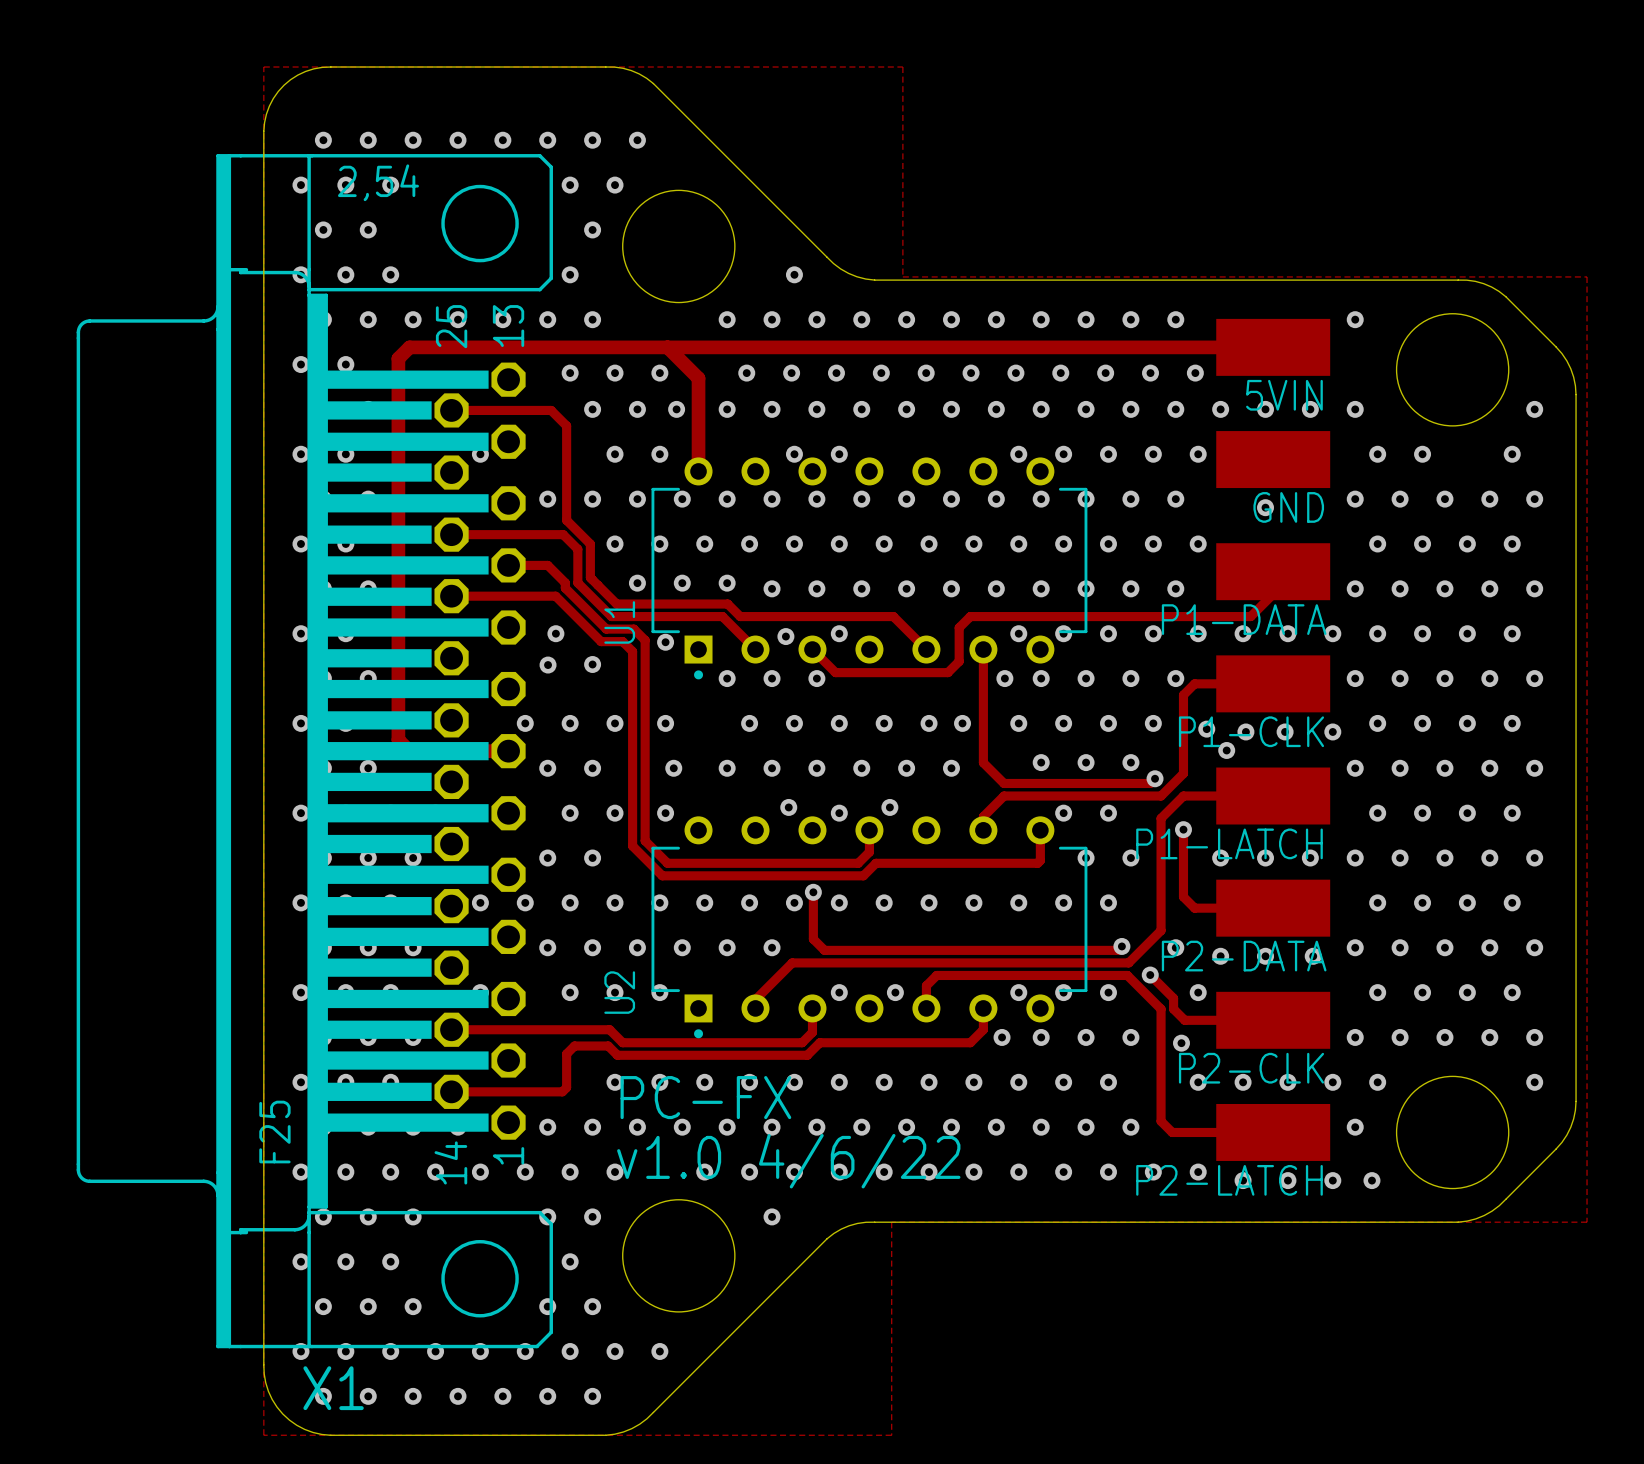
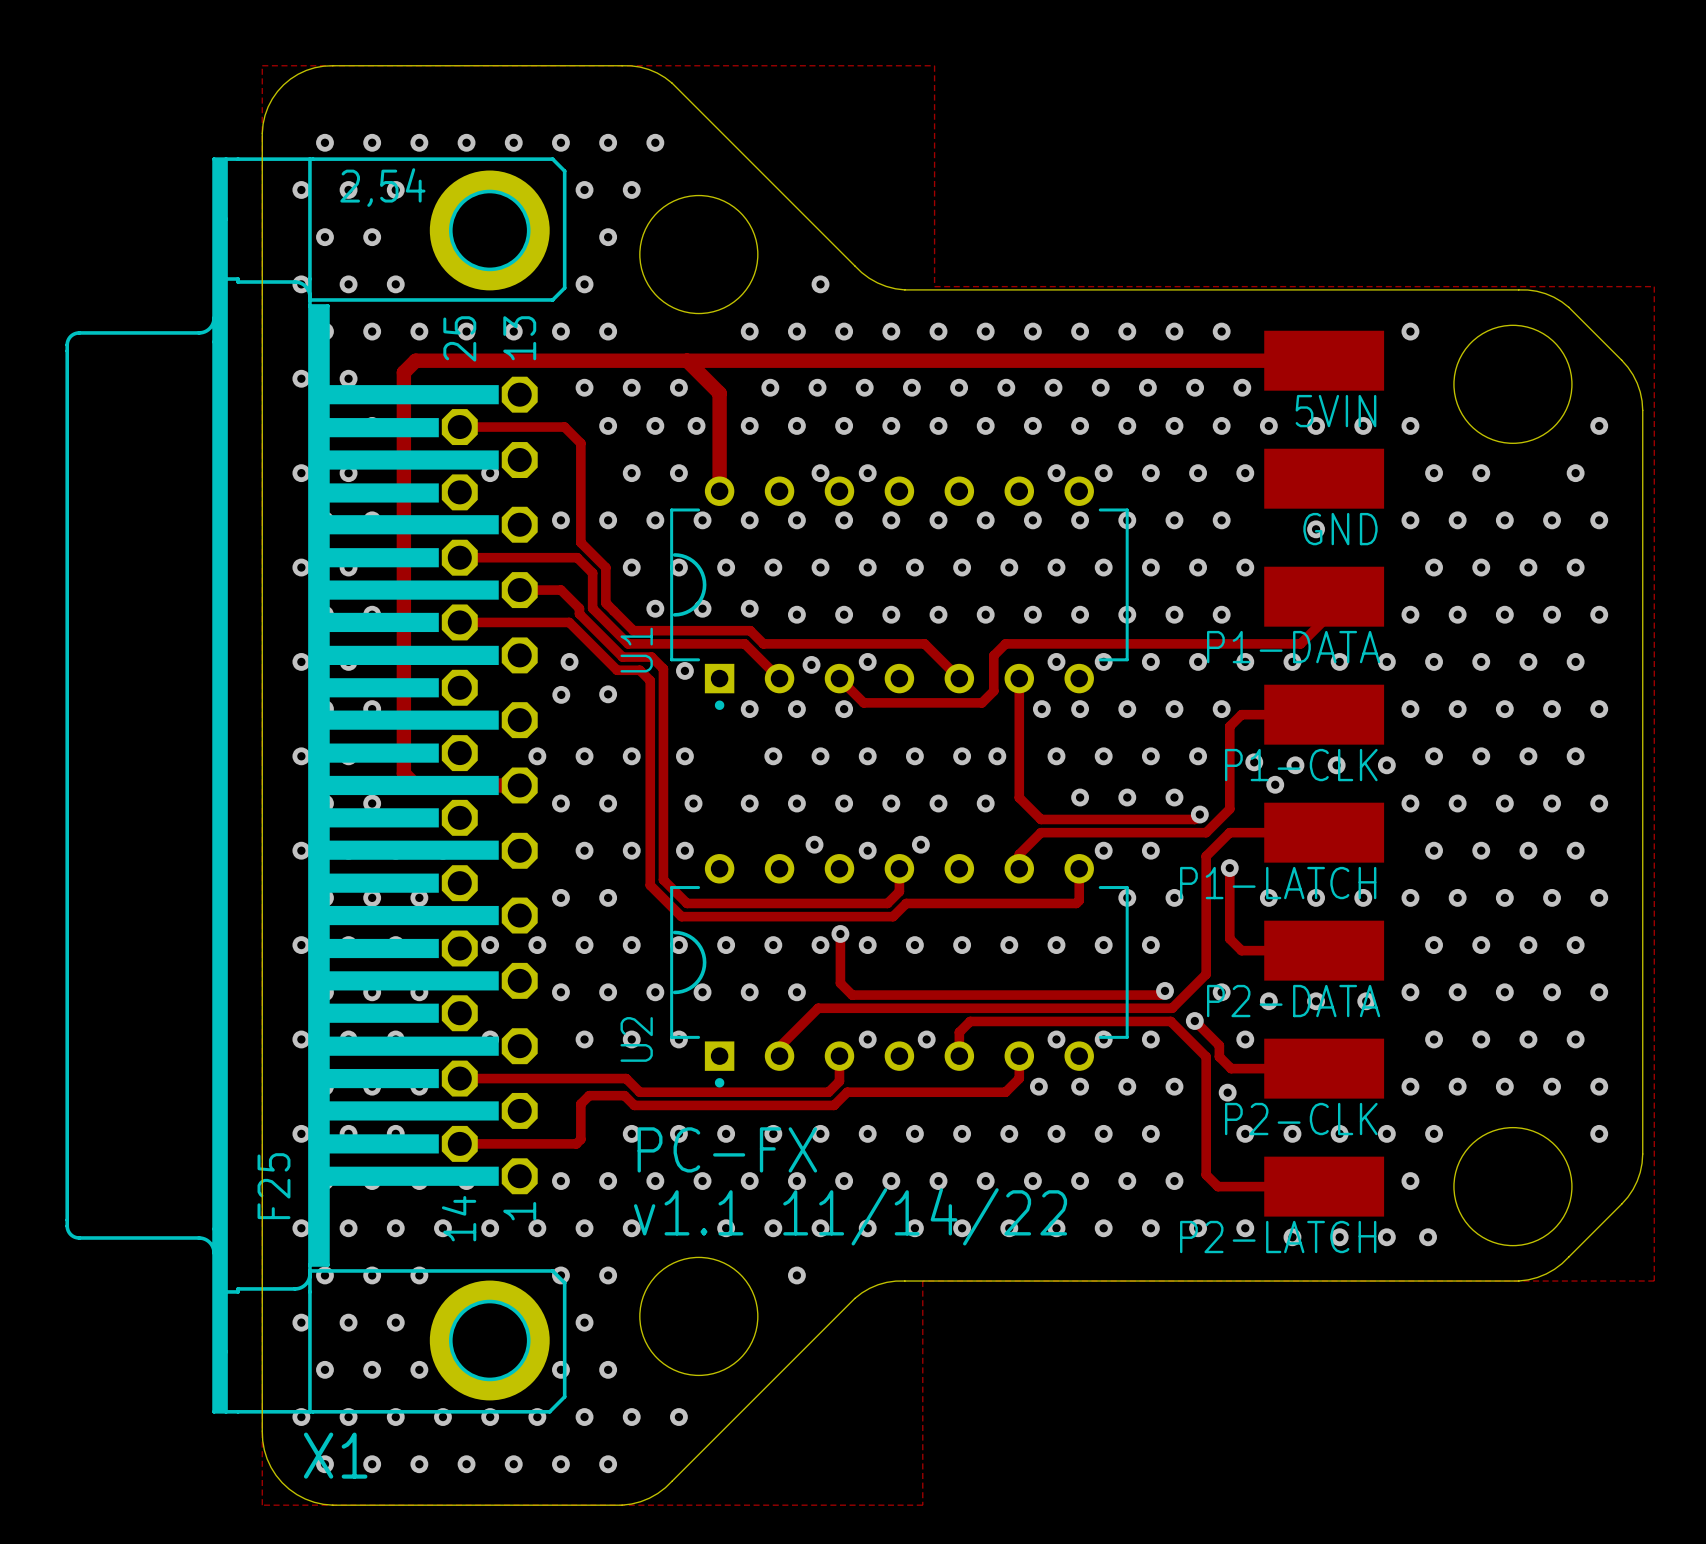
X1 footprint: [76, 154, 553, 1349] -> [65, 157, 567, 1414]
U1 footprint: [651, 457, 1088, 680] -> [670, 476, 1129, 710]
U2 footprint: [651, 816, 1088, 1039] -> [670, 854, 1129, 1088]
text: v1.0 4/6/22 (788, 1161) -> v1.1 11/14/22 (850, 1216)

